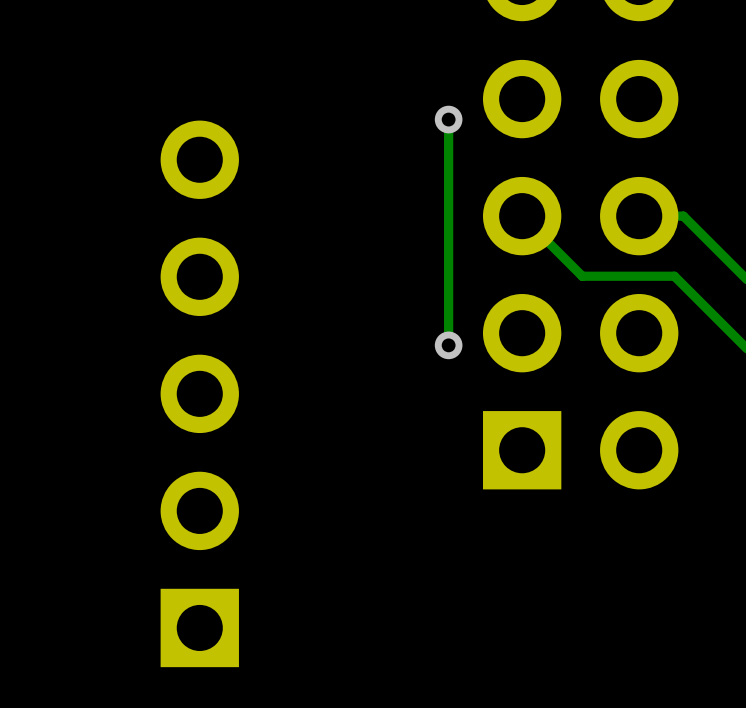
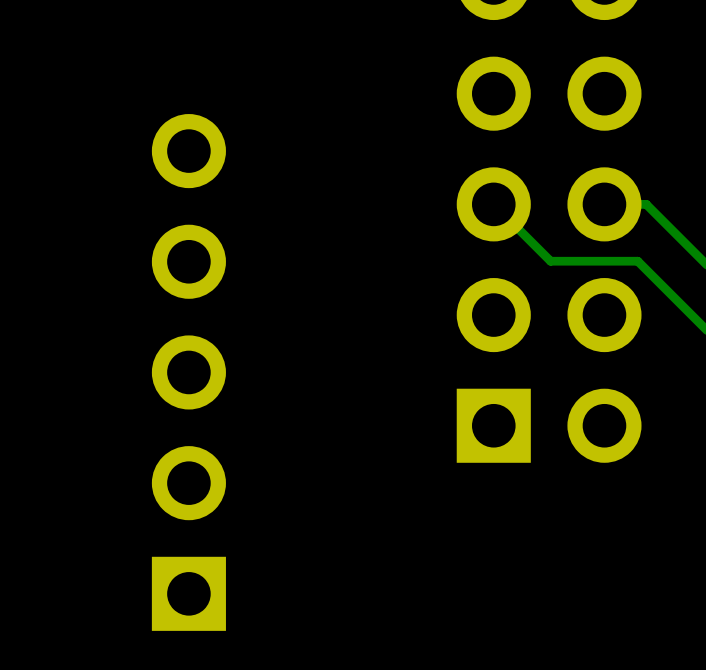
track: (448, 119) (448, 345) -> none
via: (448, 119) -> none
via: (448, 345) -> none

